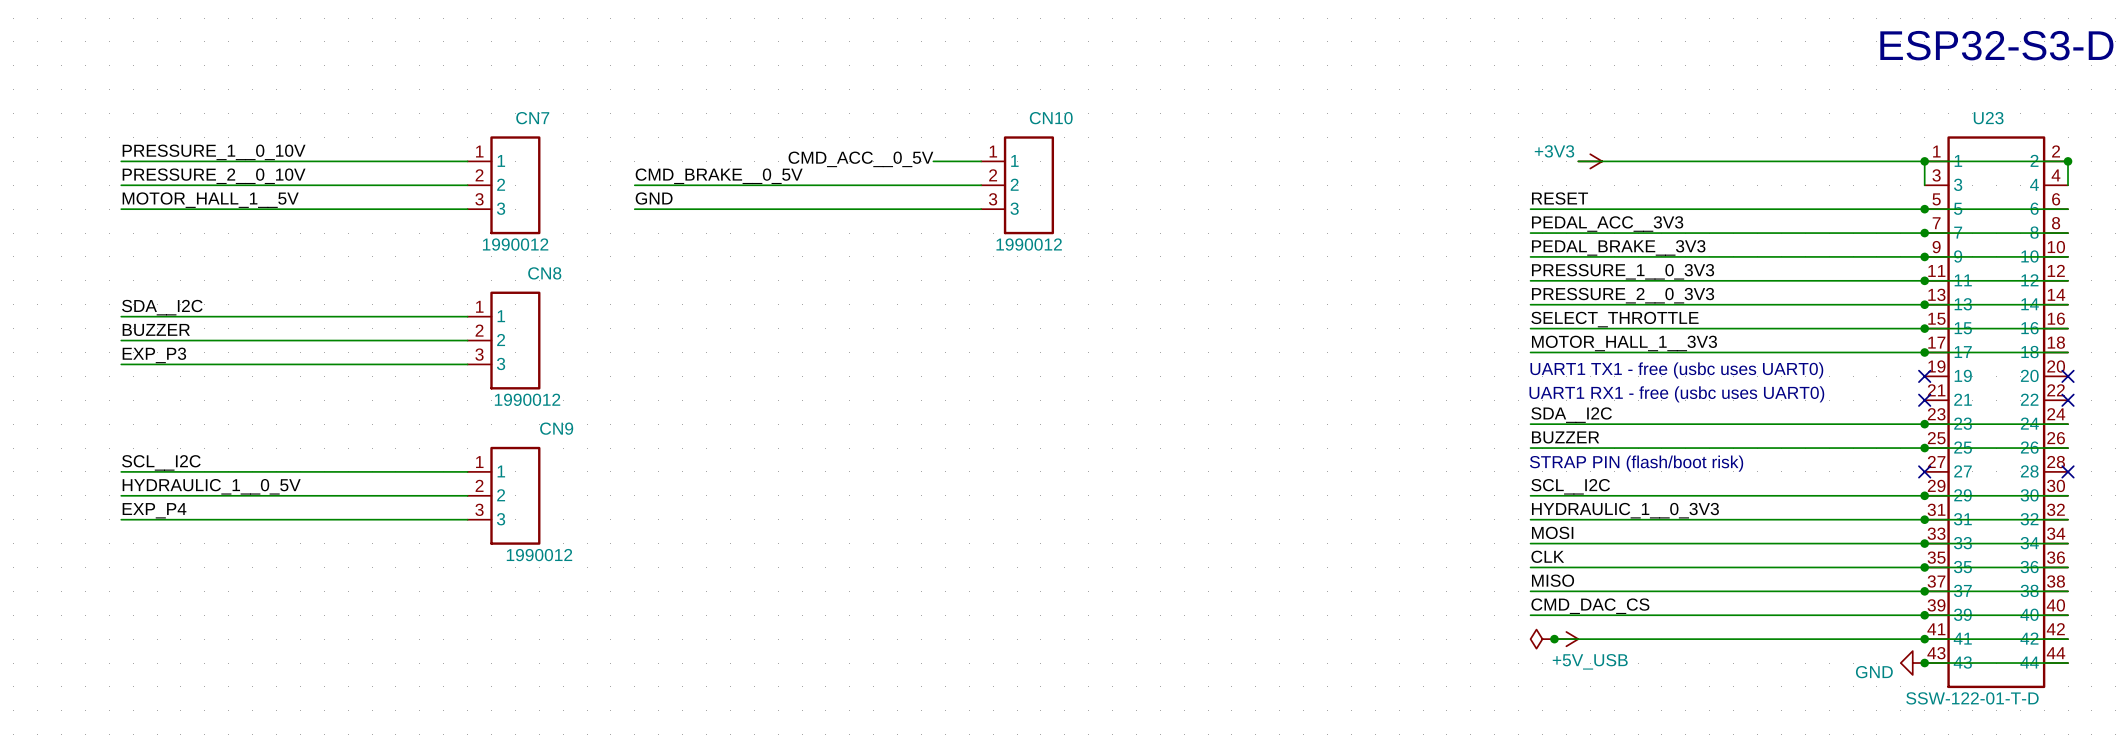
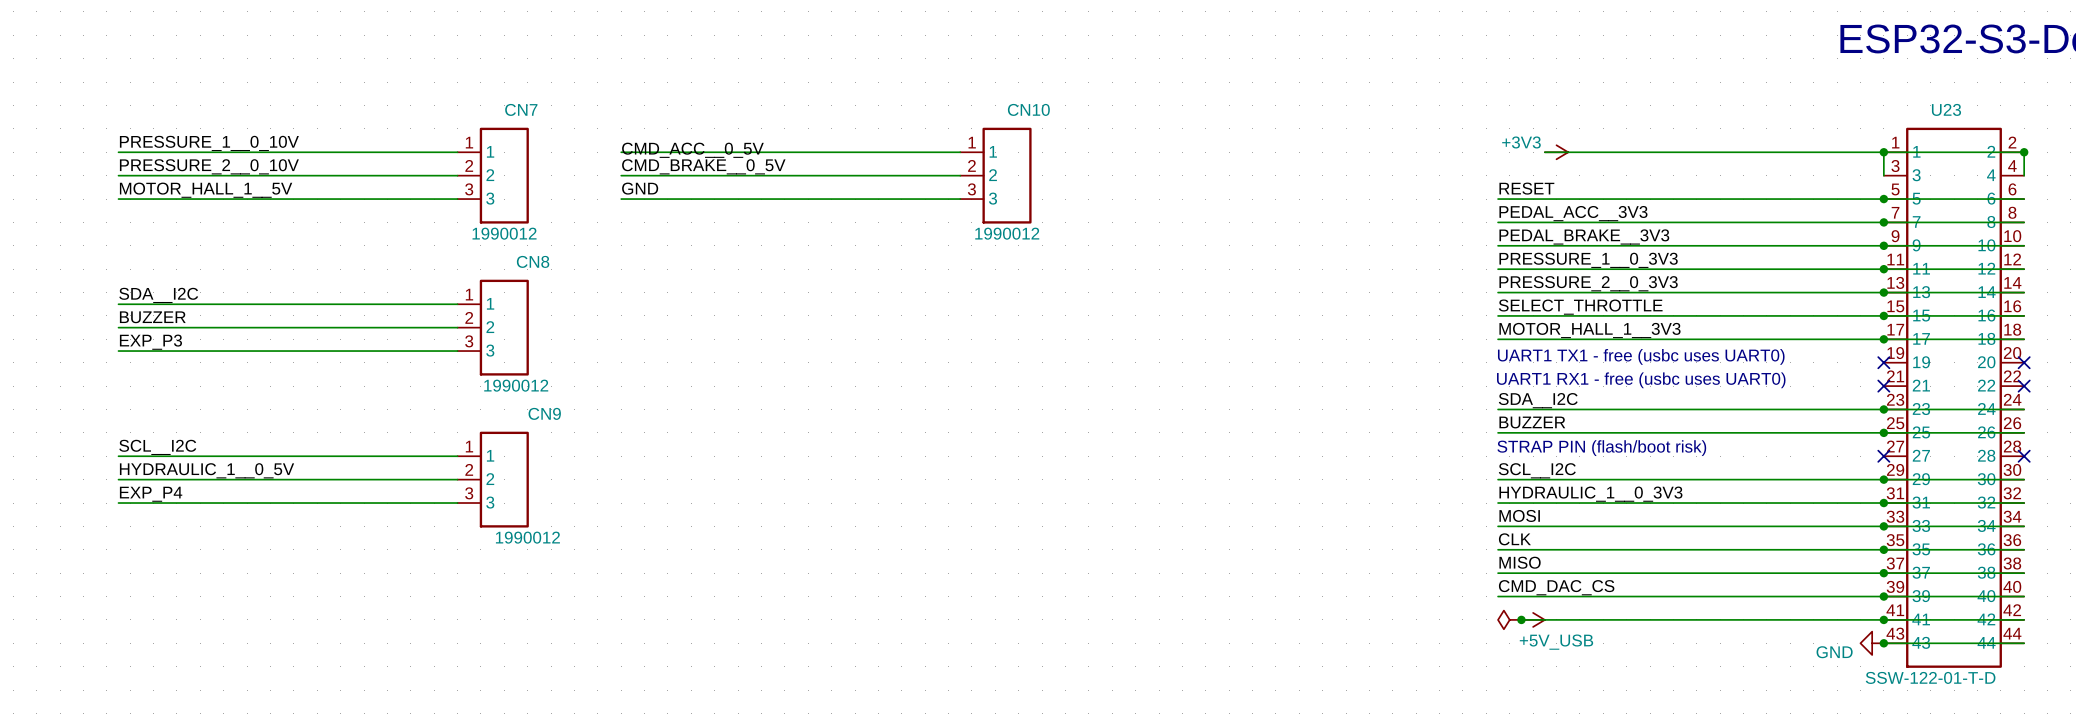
label: none -> CMD_ACC__0_5V (692, 150)
label: CMD_ACC__0_5V (860, 159) -> none
wire: none -> (621, 152) (913, 152)

